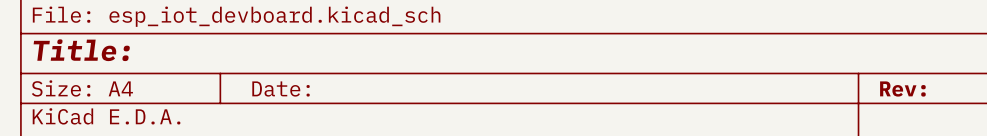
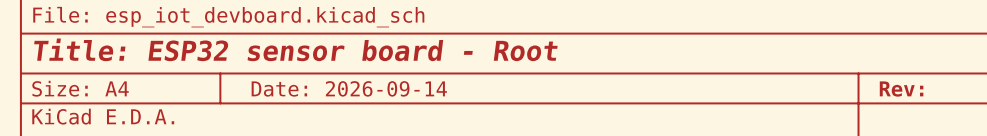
title block: Title: (81, 50) -> Title: ESP32 sensor board - Root (295, 49)
title block: Date: (281, 89) -> Date: 2026-09-14 (349, 88)

